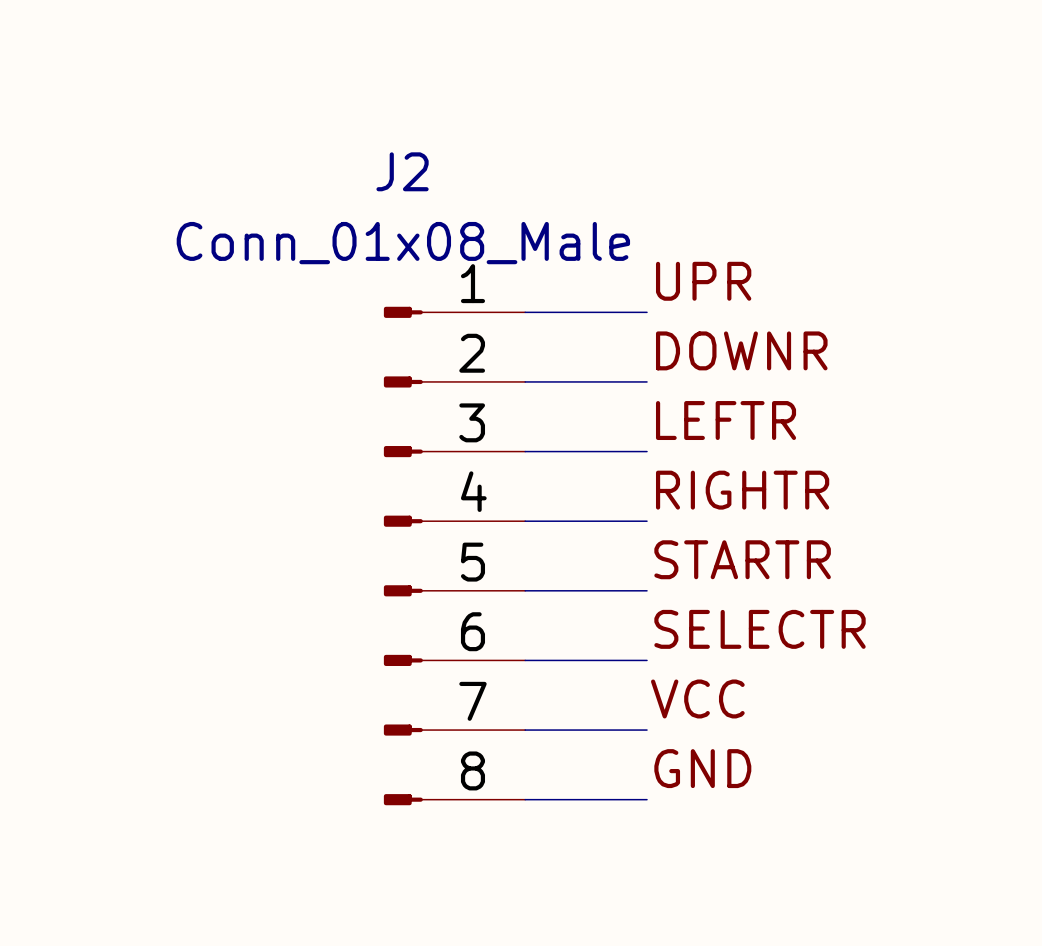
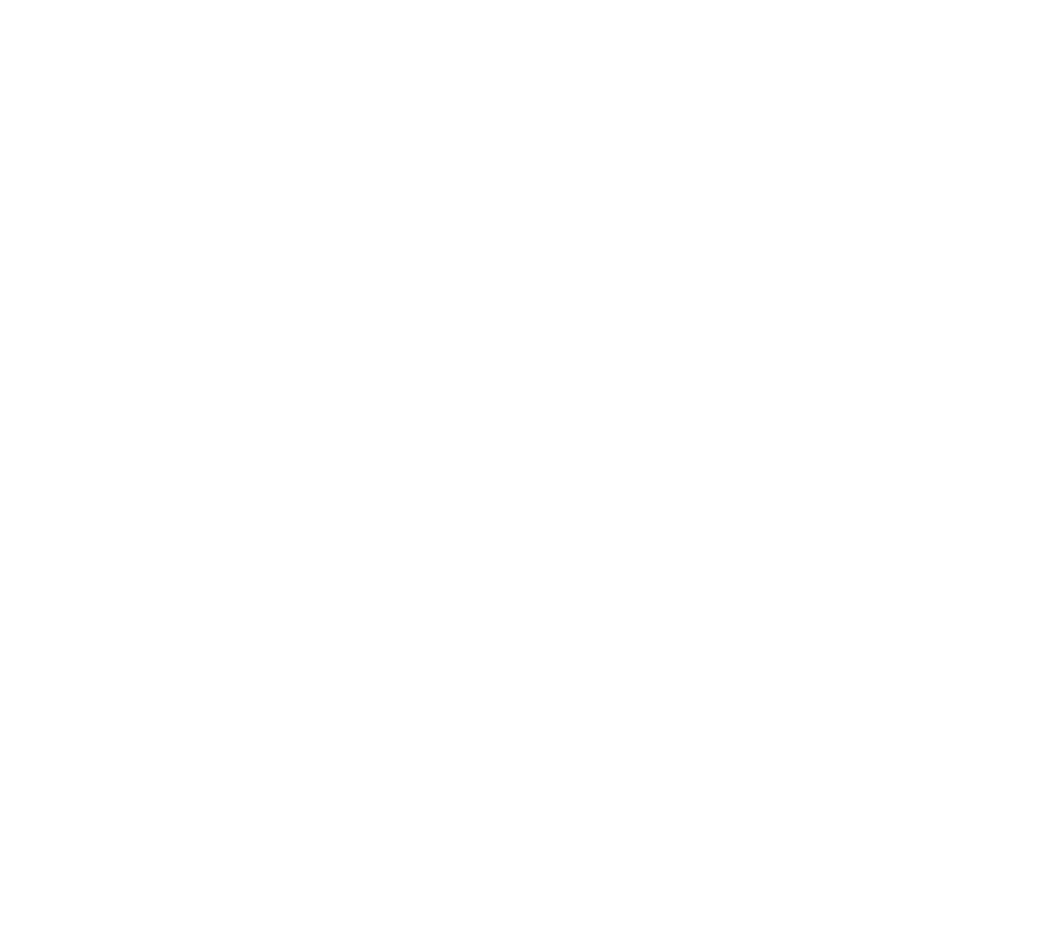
label: UPR (703, 281) -> none
wire: (525, 312) (647, 312) -> none
label: DOWNR (741, 350) -> none
wire: (525, 381) (647, 381) -> none
label: LEFTR (726, 420) -> none
wire: (525, 451) (647, 451) -> none
label: RIGHTR (742, 490) -> none
wire: (525, 521) (647, 521) -> none
J2: Conn_01x08_Male (454, 556) -> none
label: STARTR (742, 559) -> none
wire: (525, 590) (647, 590) -> none
label: SELECTR (760, 629) -> none
wire: (525, 660) (647, 660) -> none
label: VCC (697, 698) -> none
wire: (525, 730) (647, 730) -> none
label: GND (702, 768) -> none
wire: (525, 799) (647, 799) -> none

